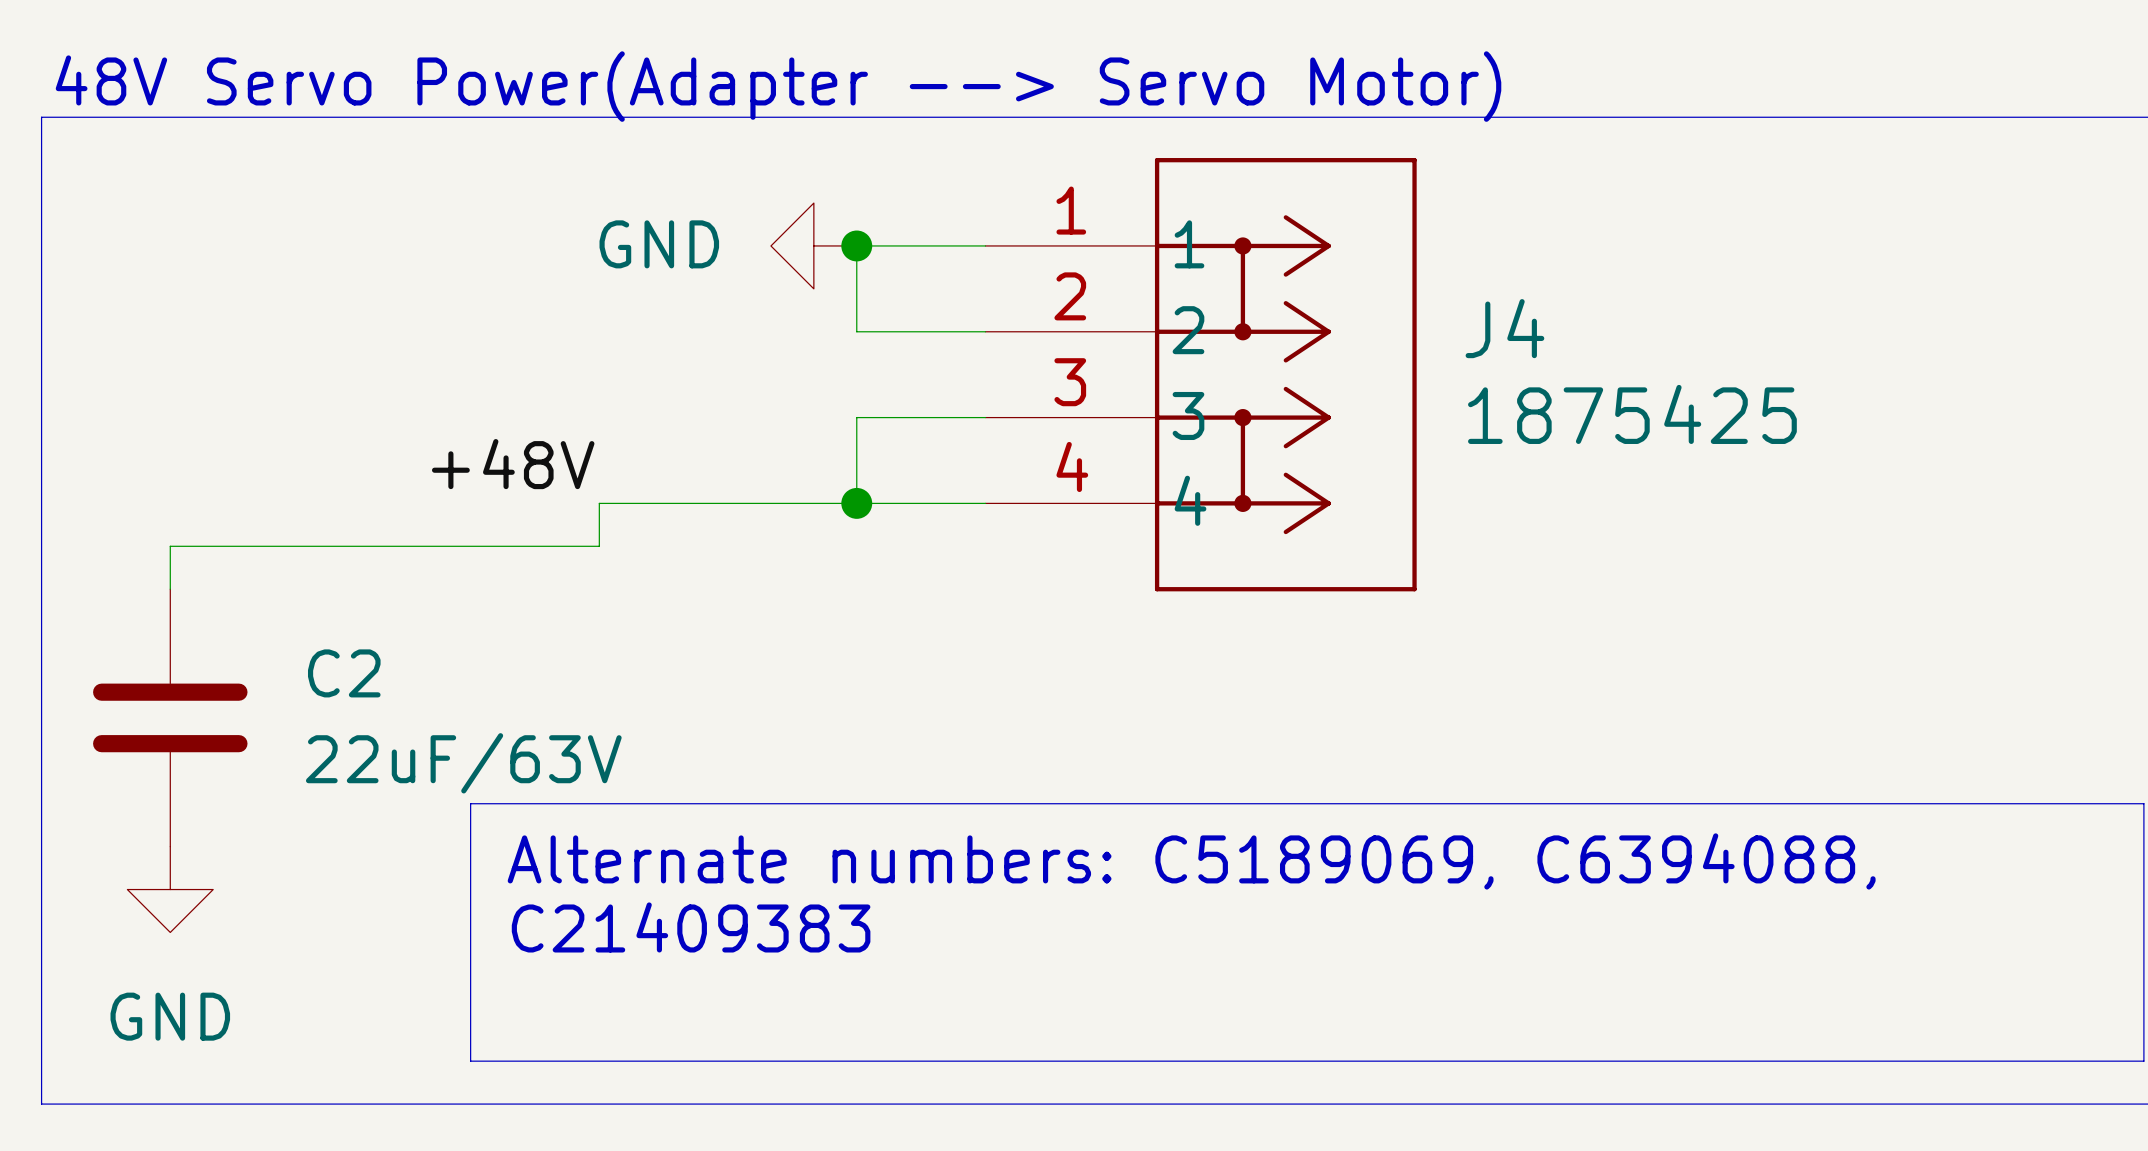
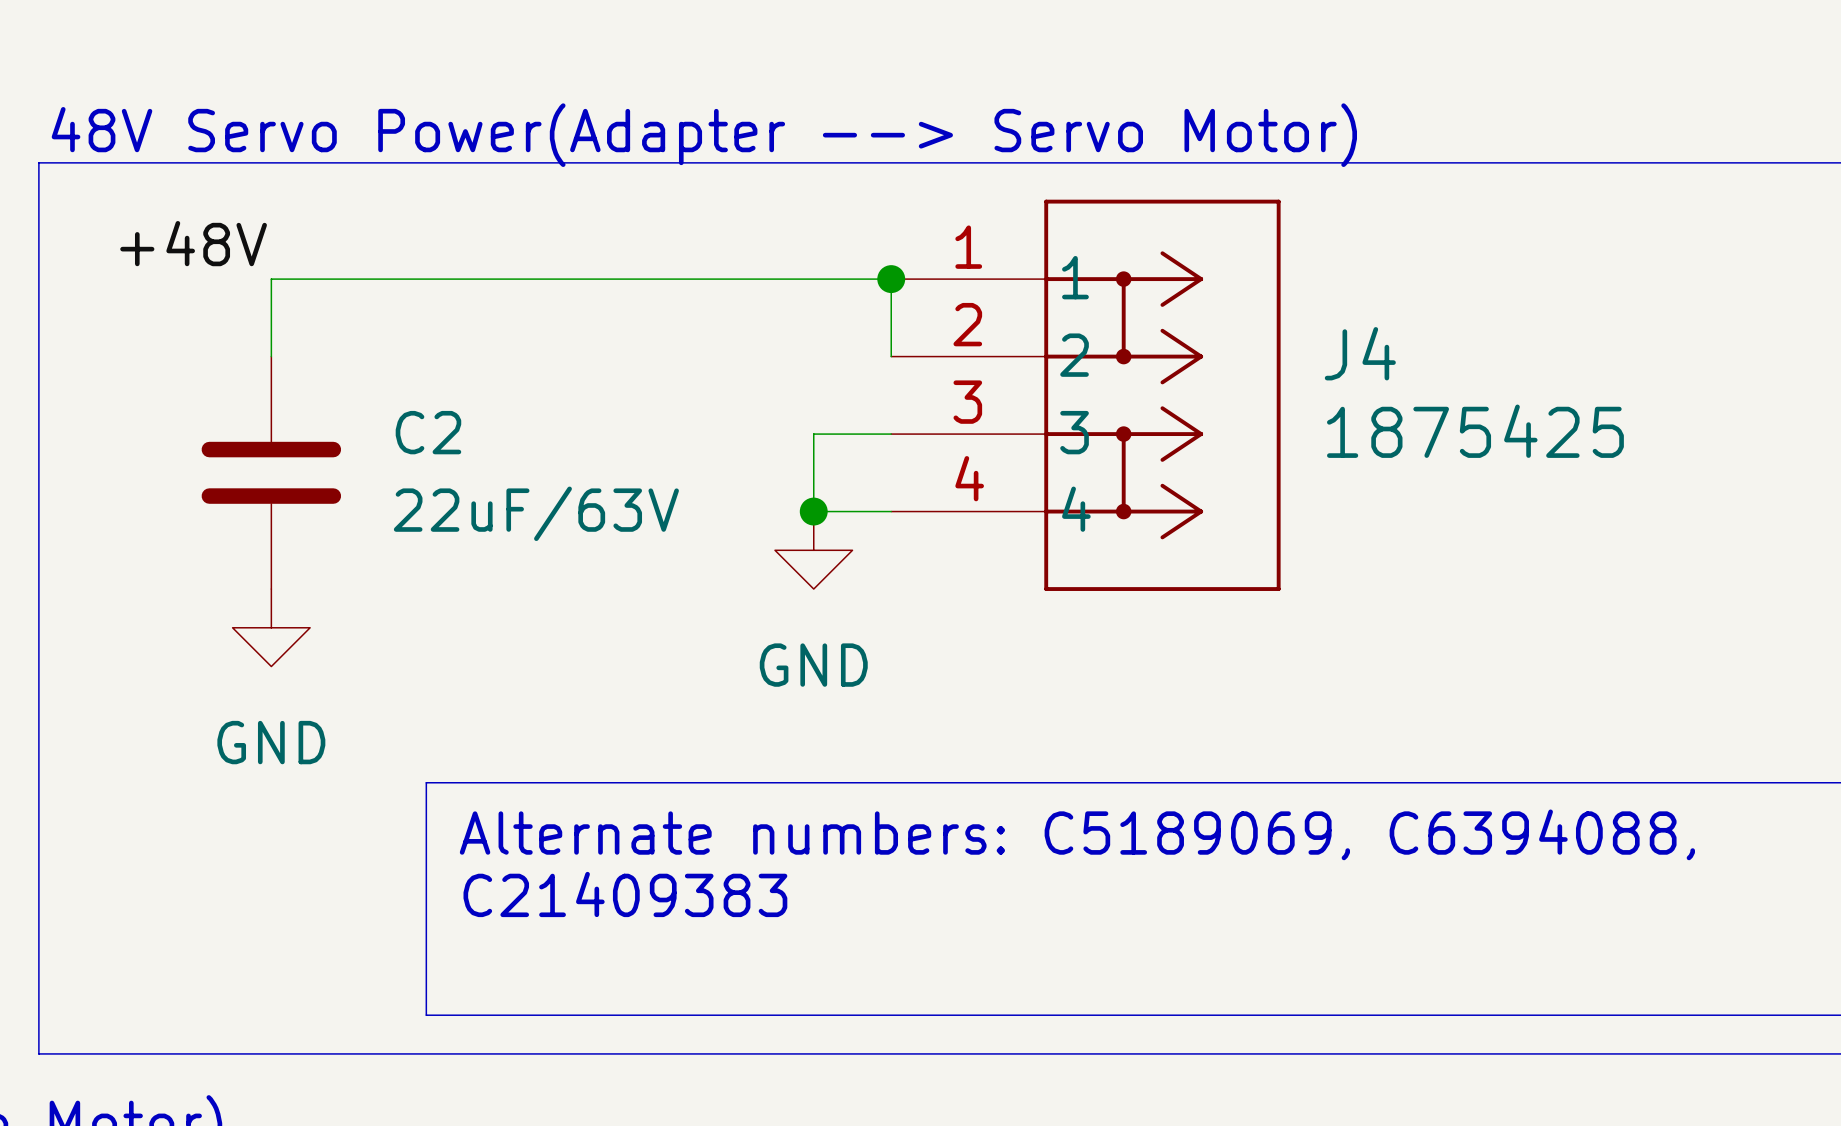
power symbol rotation: 0° (813, 245) -> 90° counterclockwise (813, 550)
power symbol position: GND (813, 245) -> GND (813, 550)
wire: (856, 245) (856, 331) (985, 331) -> (891, 279) (891, 356)
wire: none -> (775, 279) (271, 279) (271, 356)
junction position: (856, 245) -> (891, 279)
wire: (899, 417) (856, 417) (856, 503) -> (813, 434) (813, 511)
label position: +48V (513, 464) -> +48V (193, 243)
junction position: (856, 503) -> (813, 511)
wire: (899, 503) (599, 503) (599, 546) (170, 546) (170, 589) -> none
C2 position: (170, 717) -> (271, 472)
power symbol position: GND (170, 889) -> GND (271, 627)

